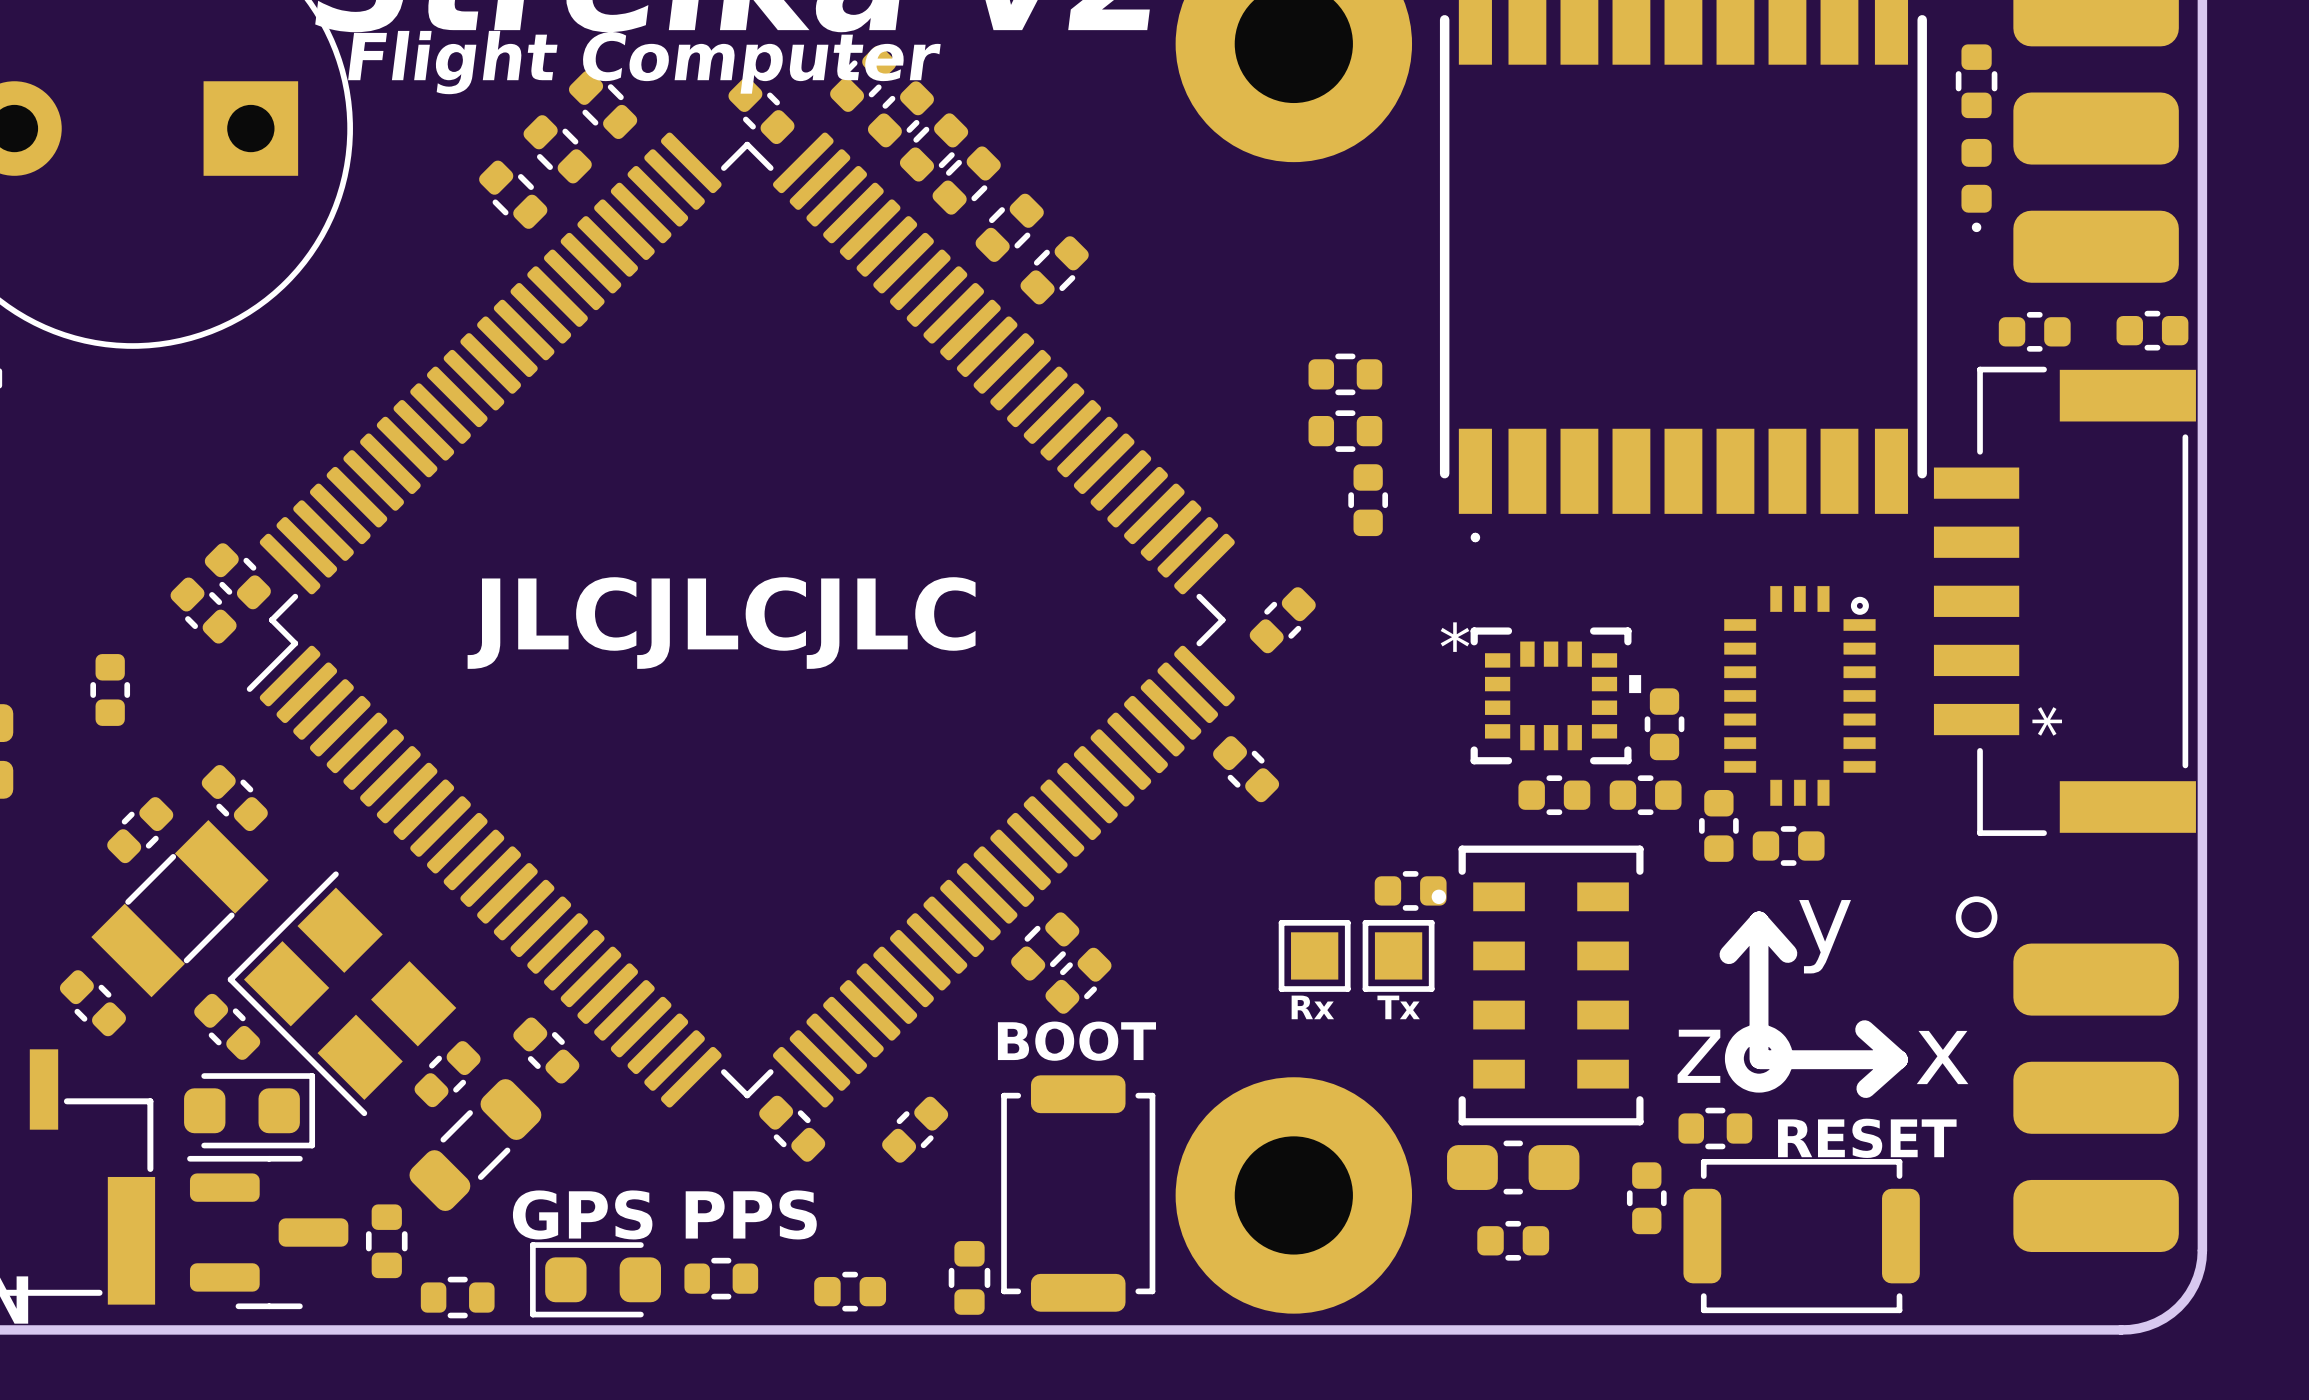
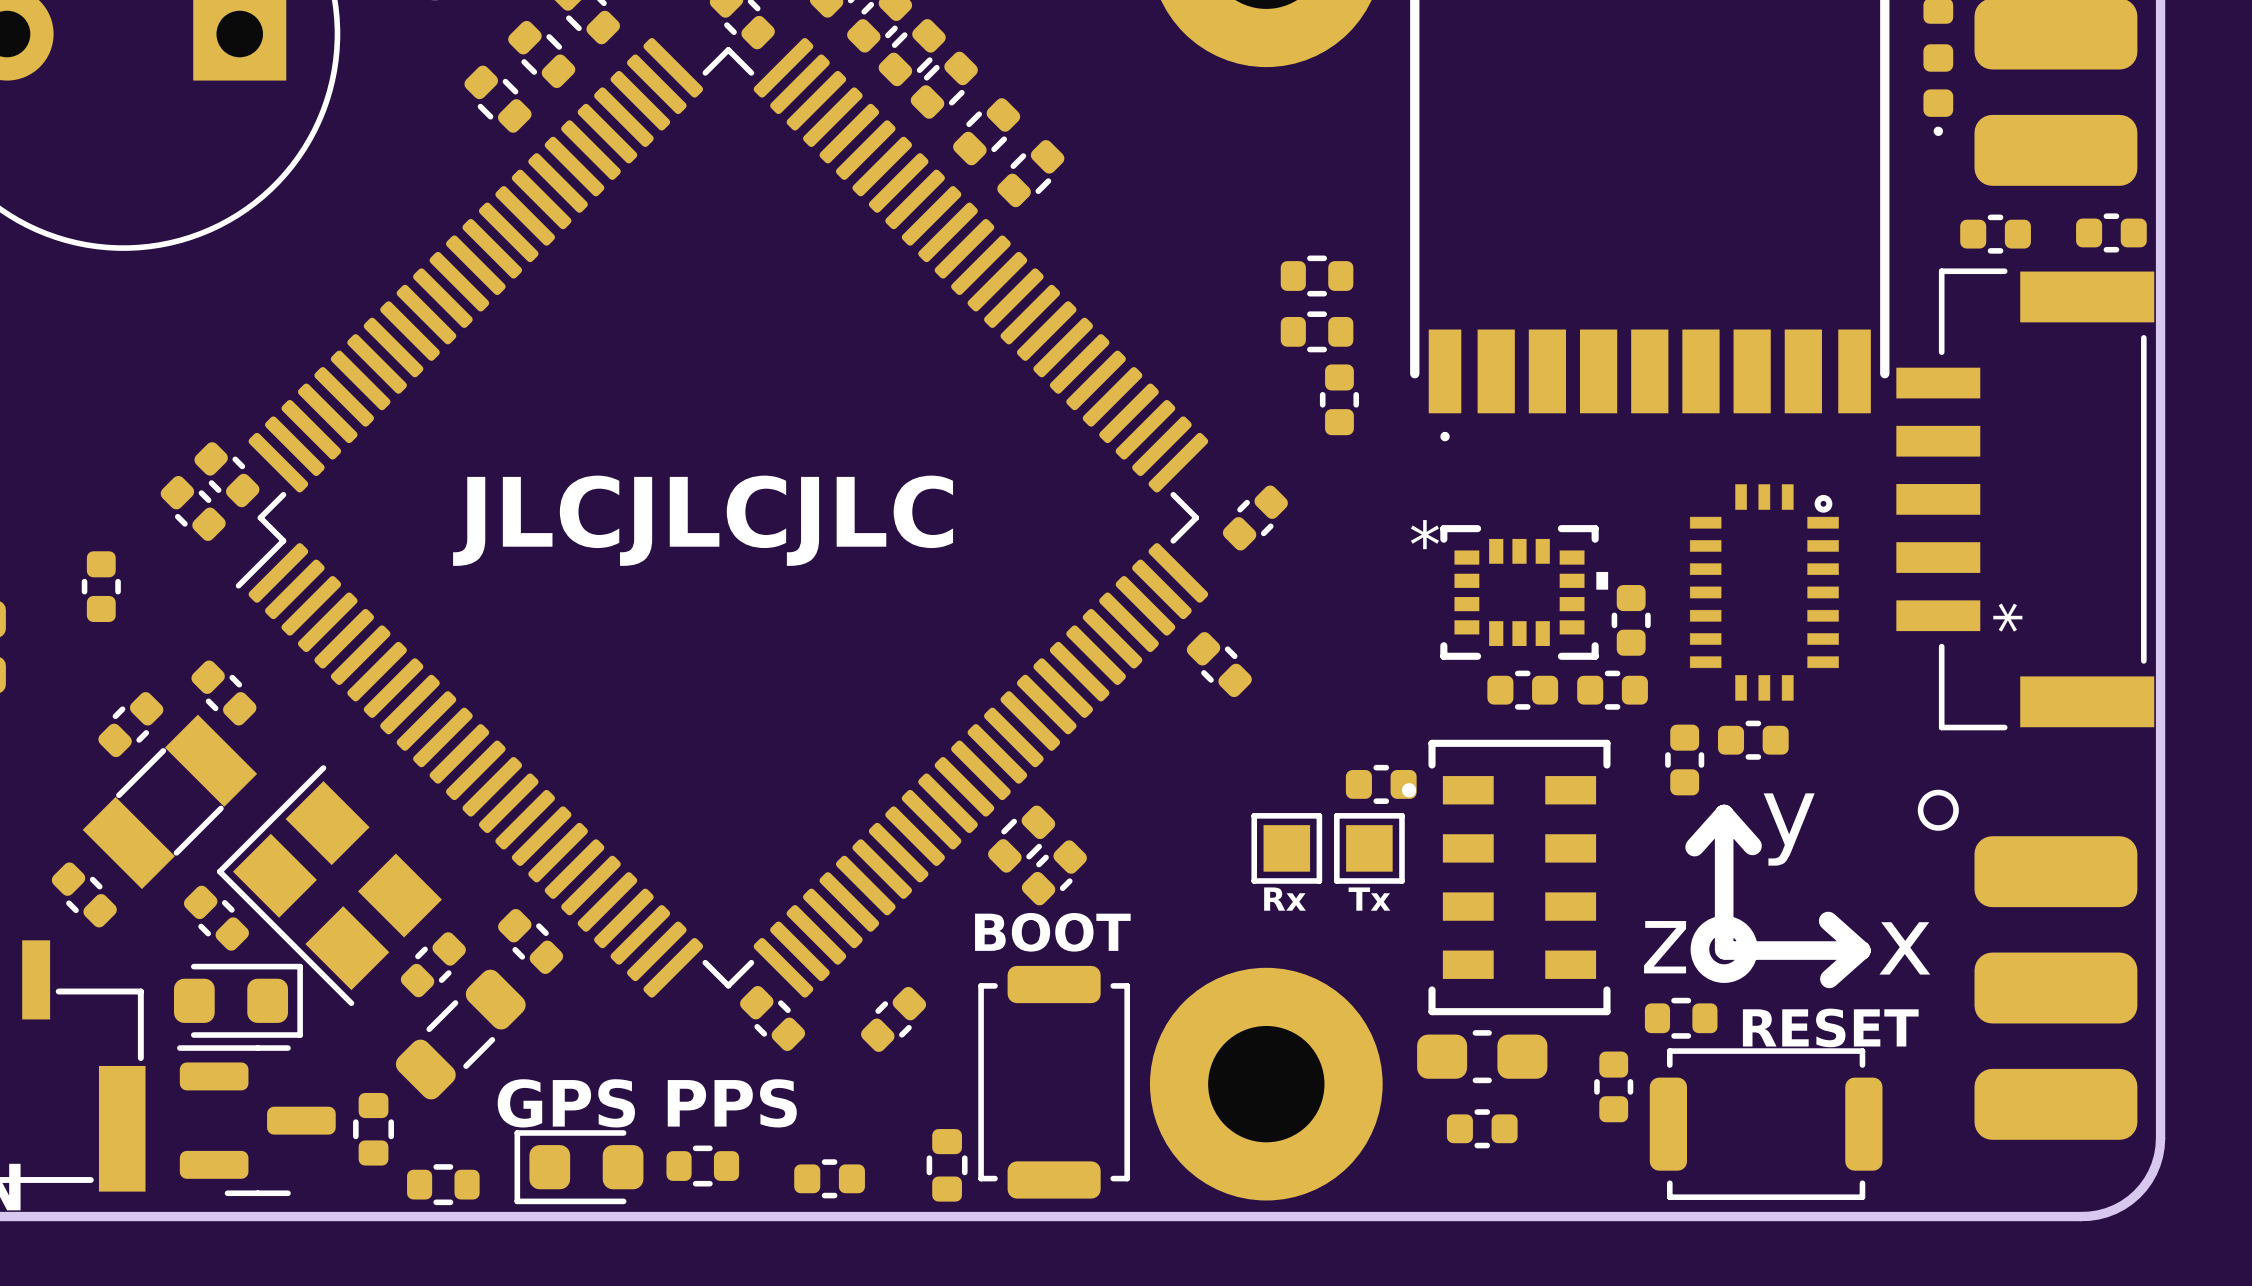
part position: (1718, 825) -> (1684, 759)

